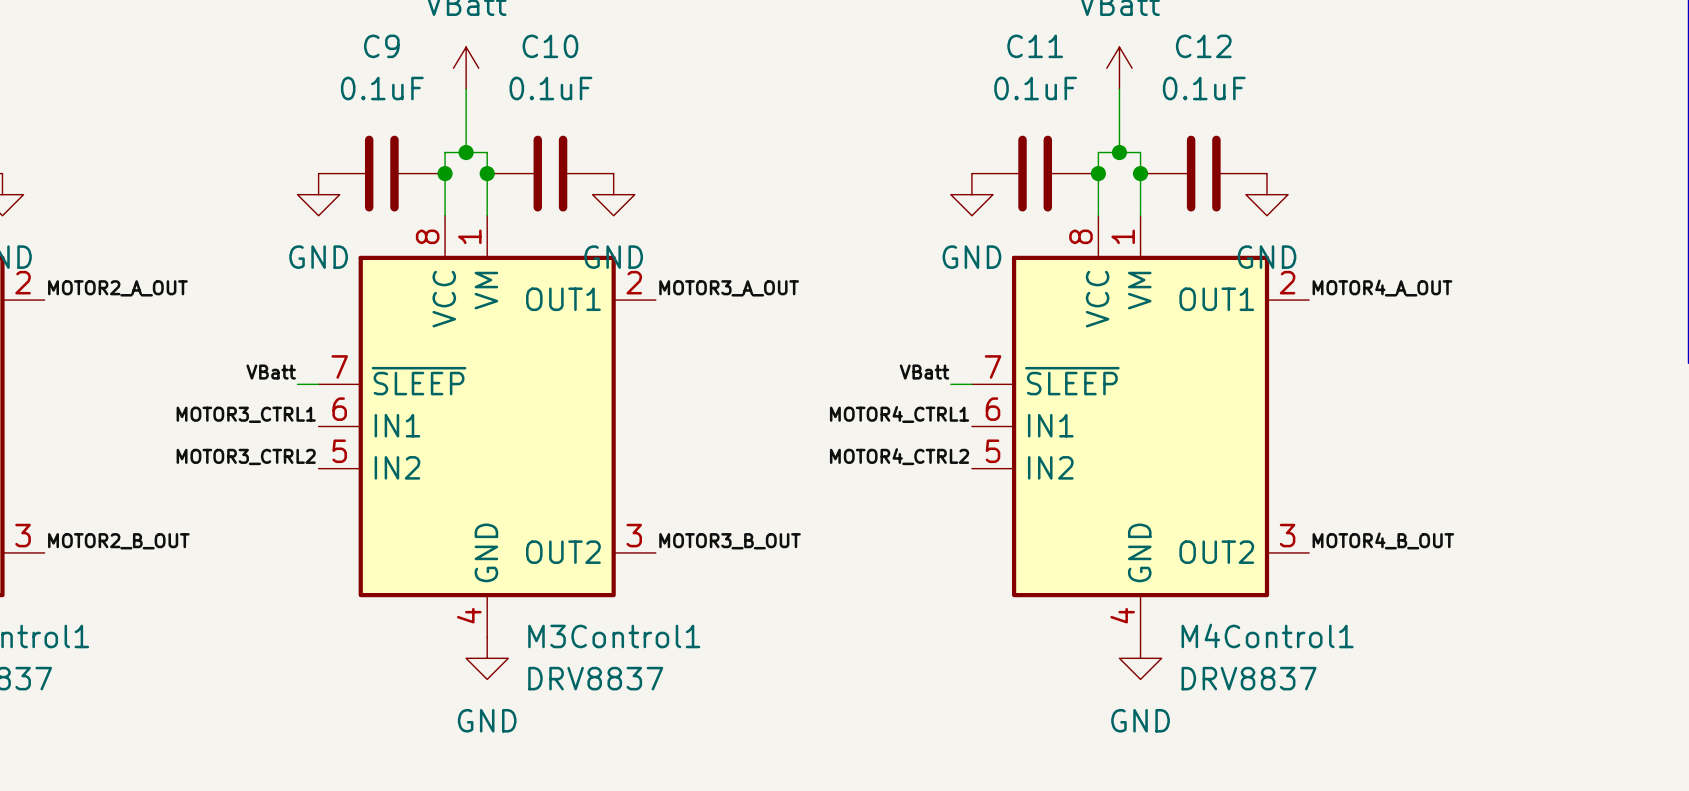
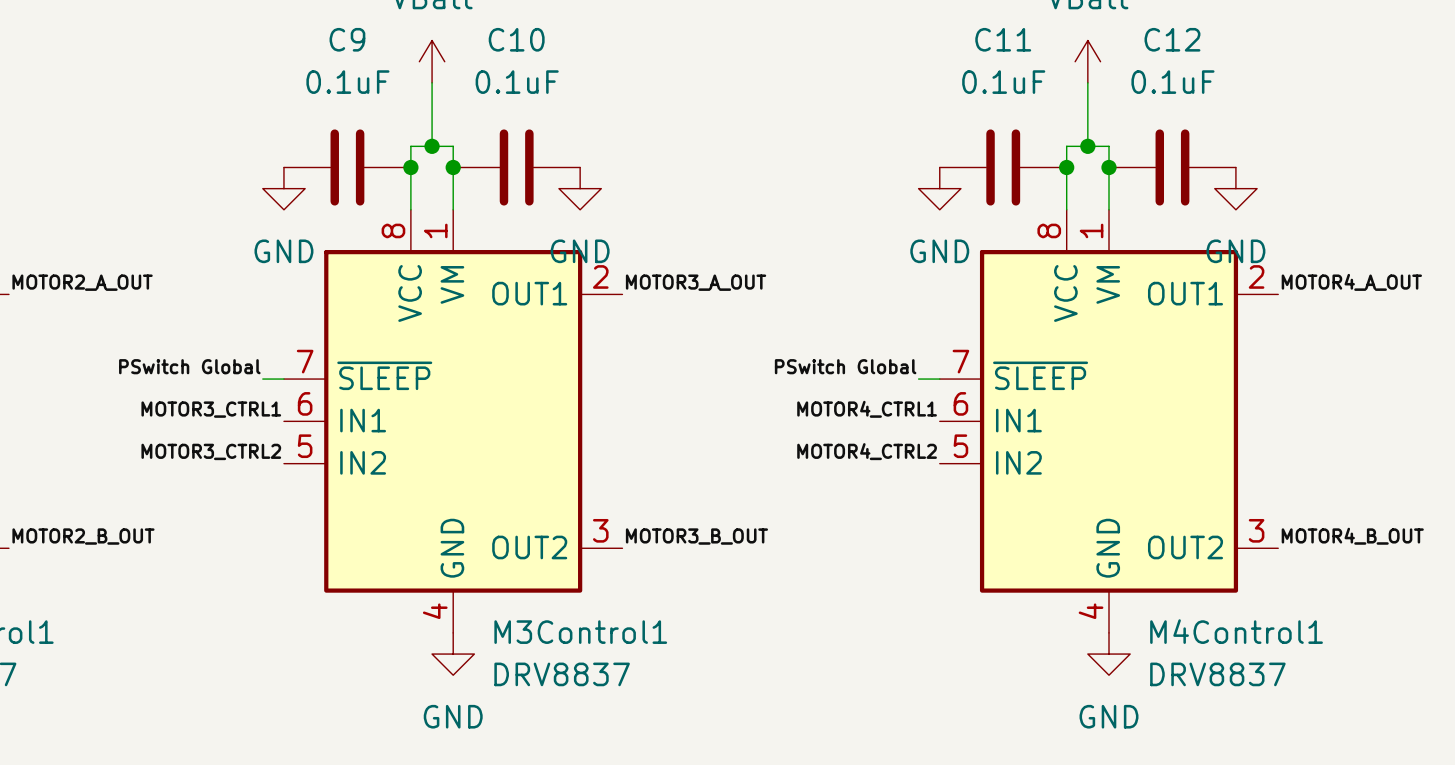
label: VBatt (271, 372) -> PSwitch Global (189, 366)
label: VBatt (924, 372) -> PSwitch Global (845, 366)

